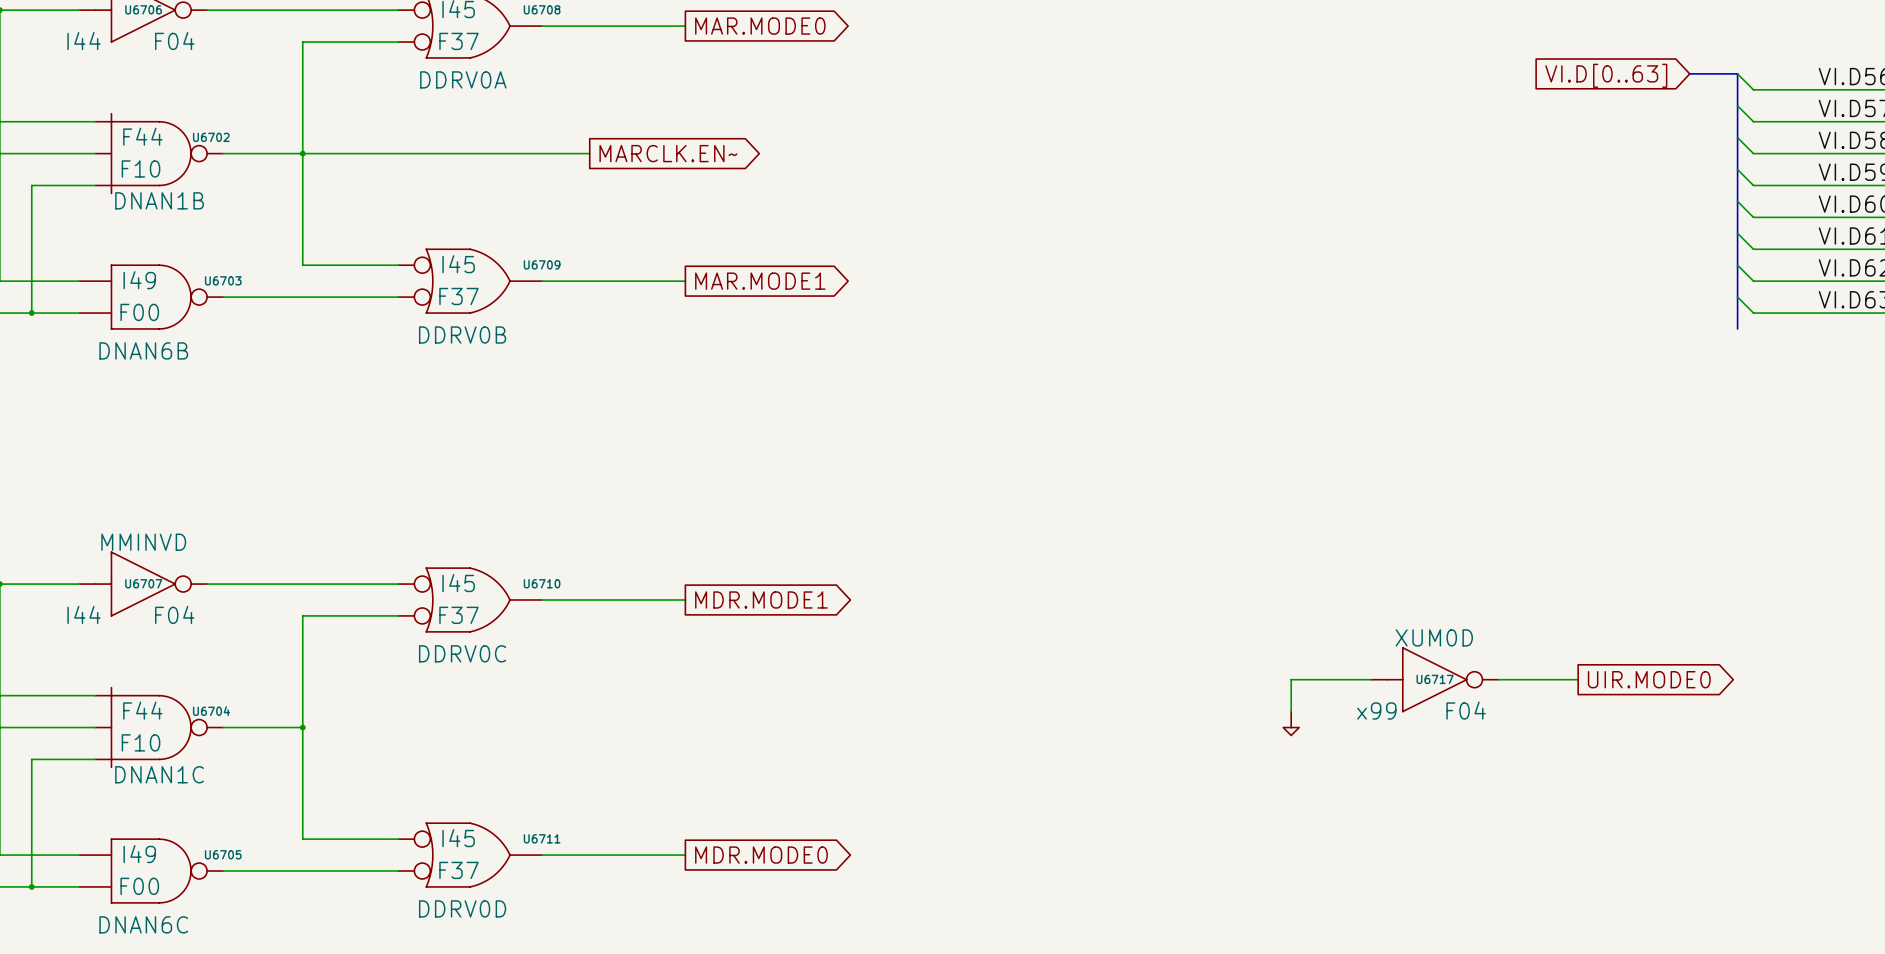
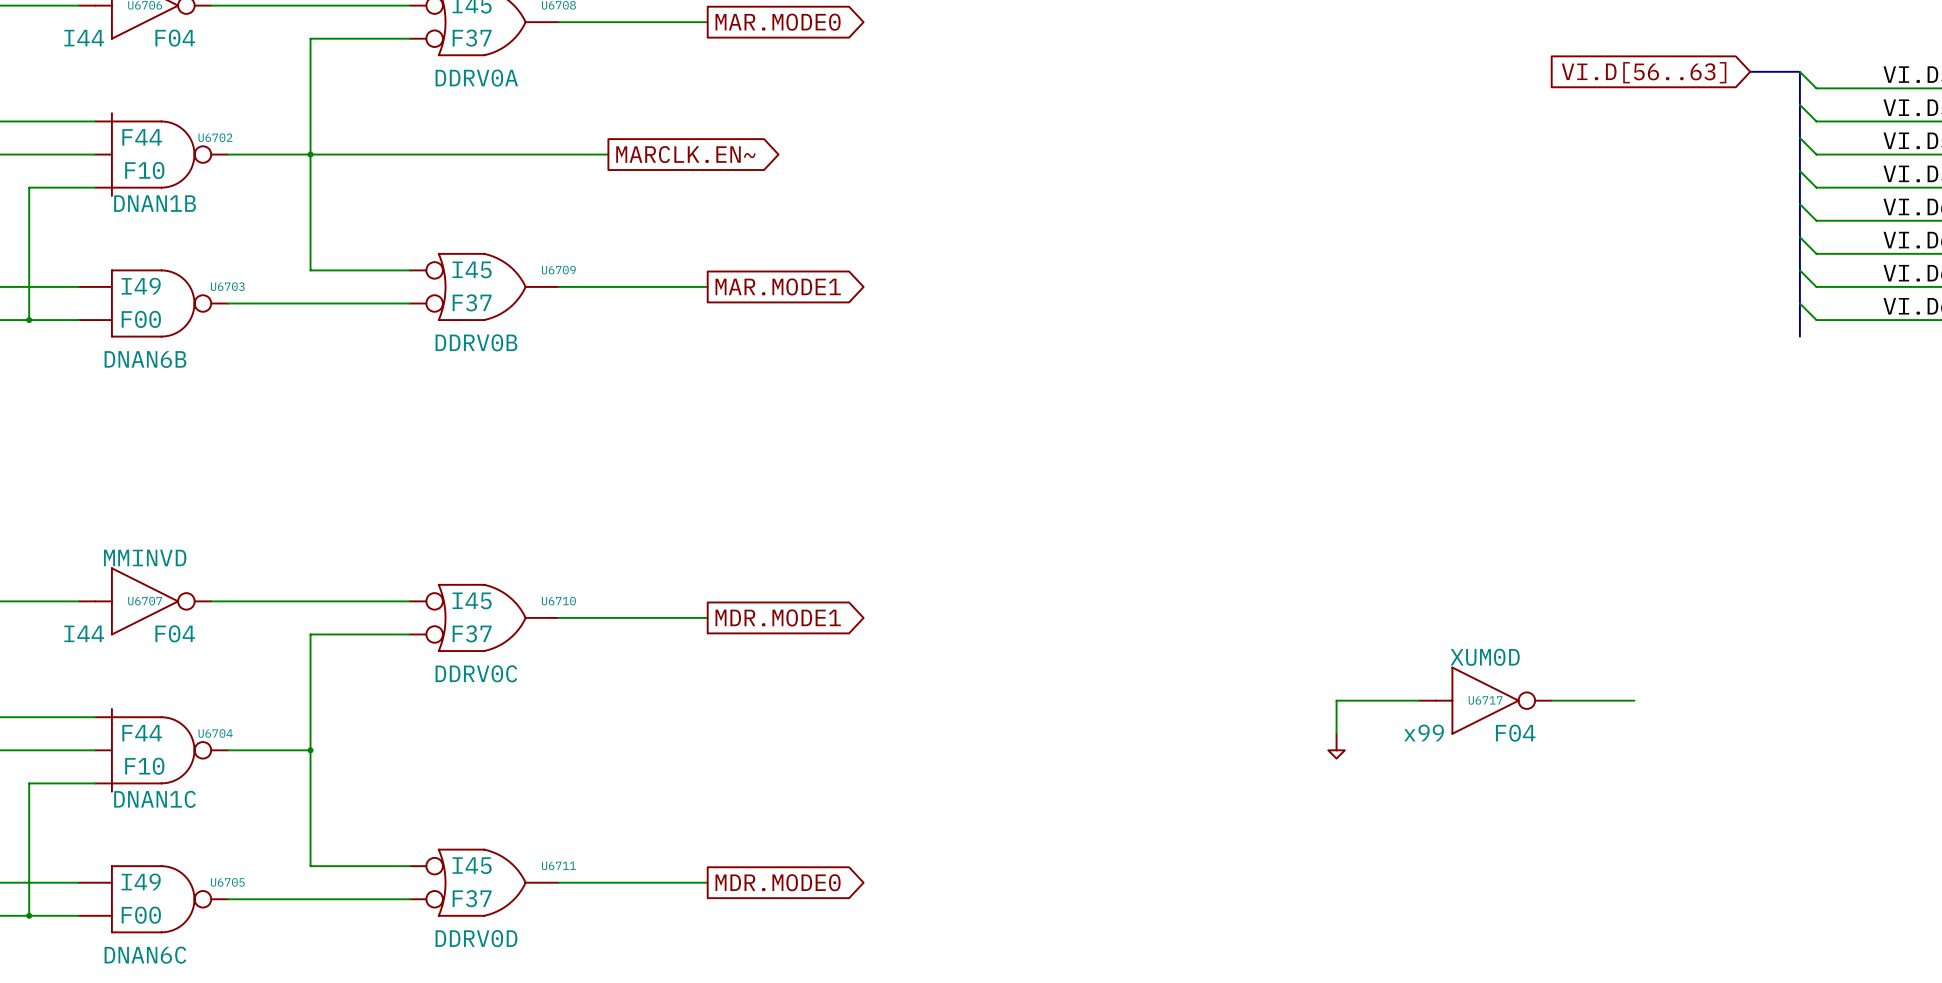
global label: VI.D[0..63] (1606, 75) -> VI.D[56..63] (1644, 72)
global label: UIR.MODE0 (1649, 679) -> none

